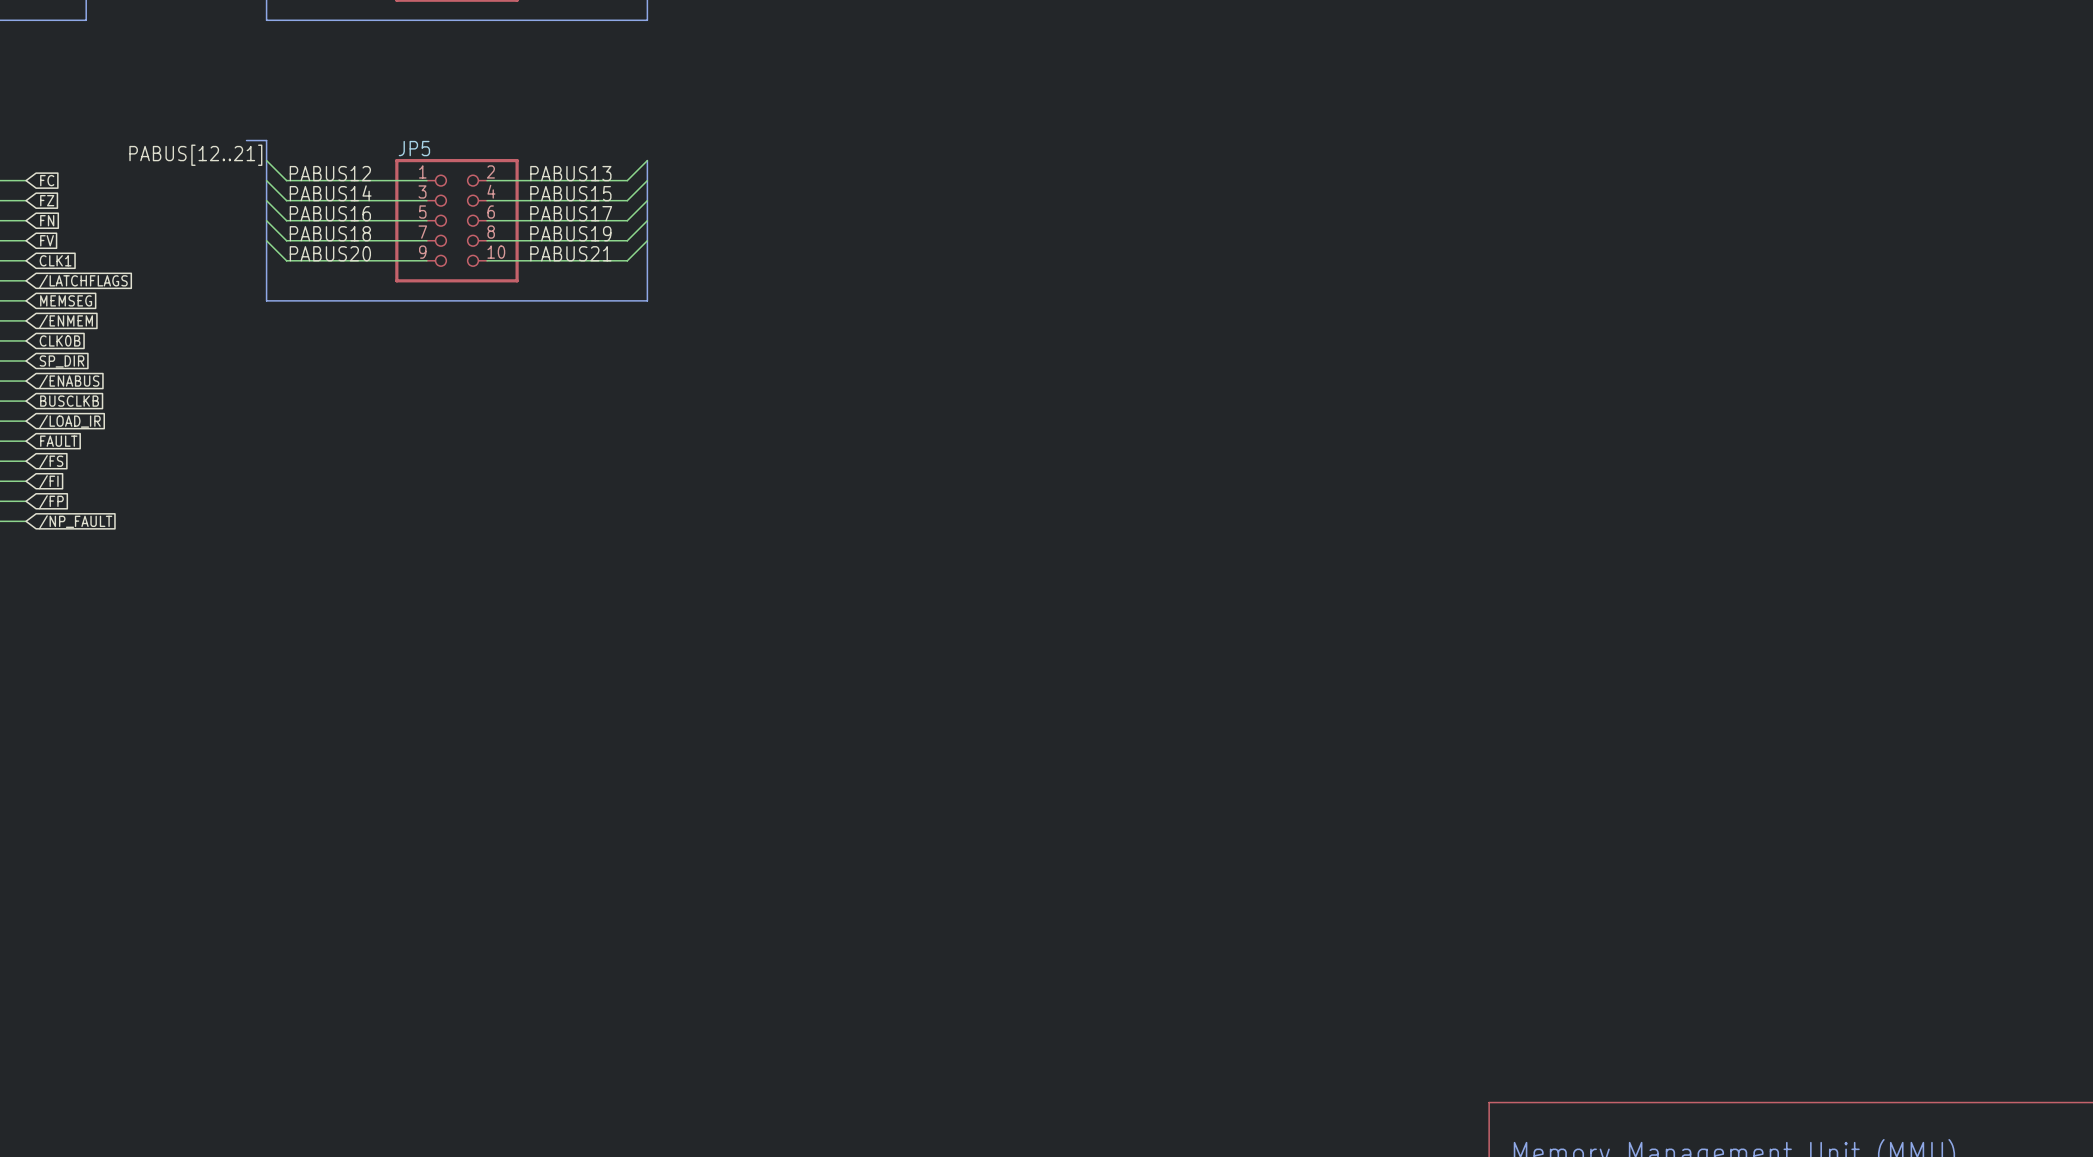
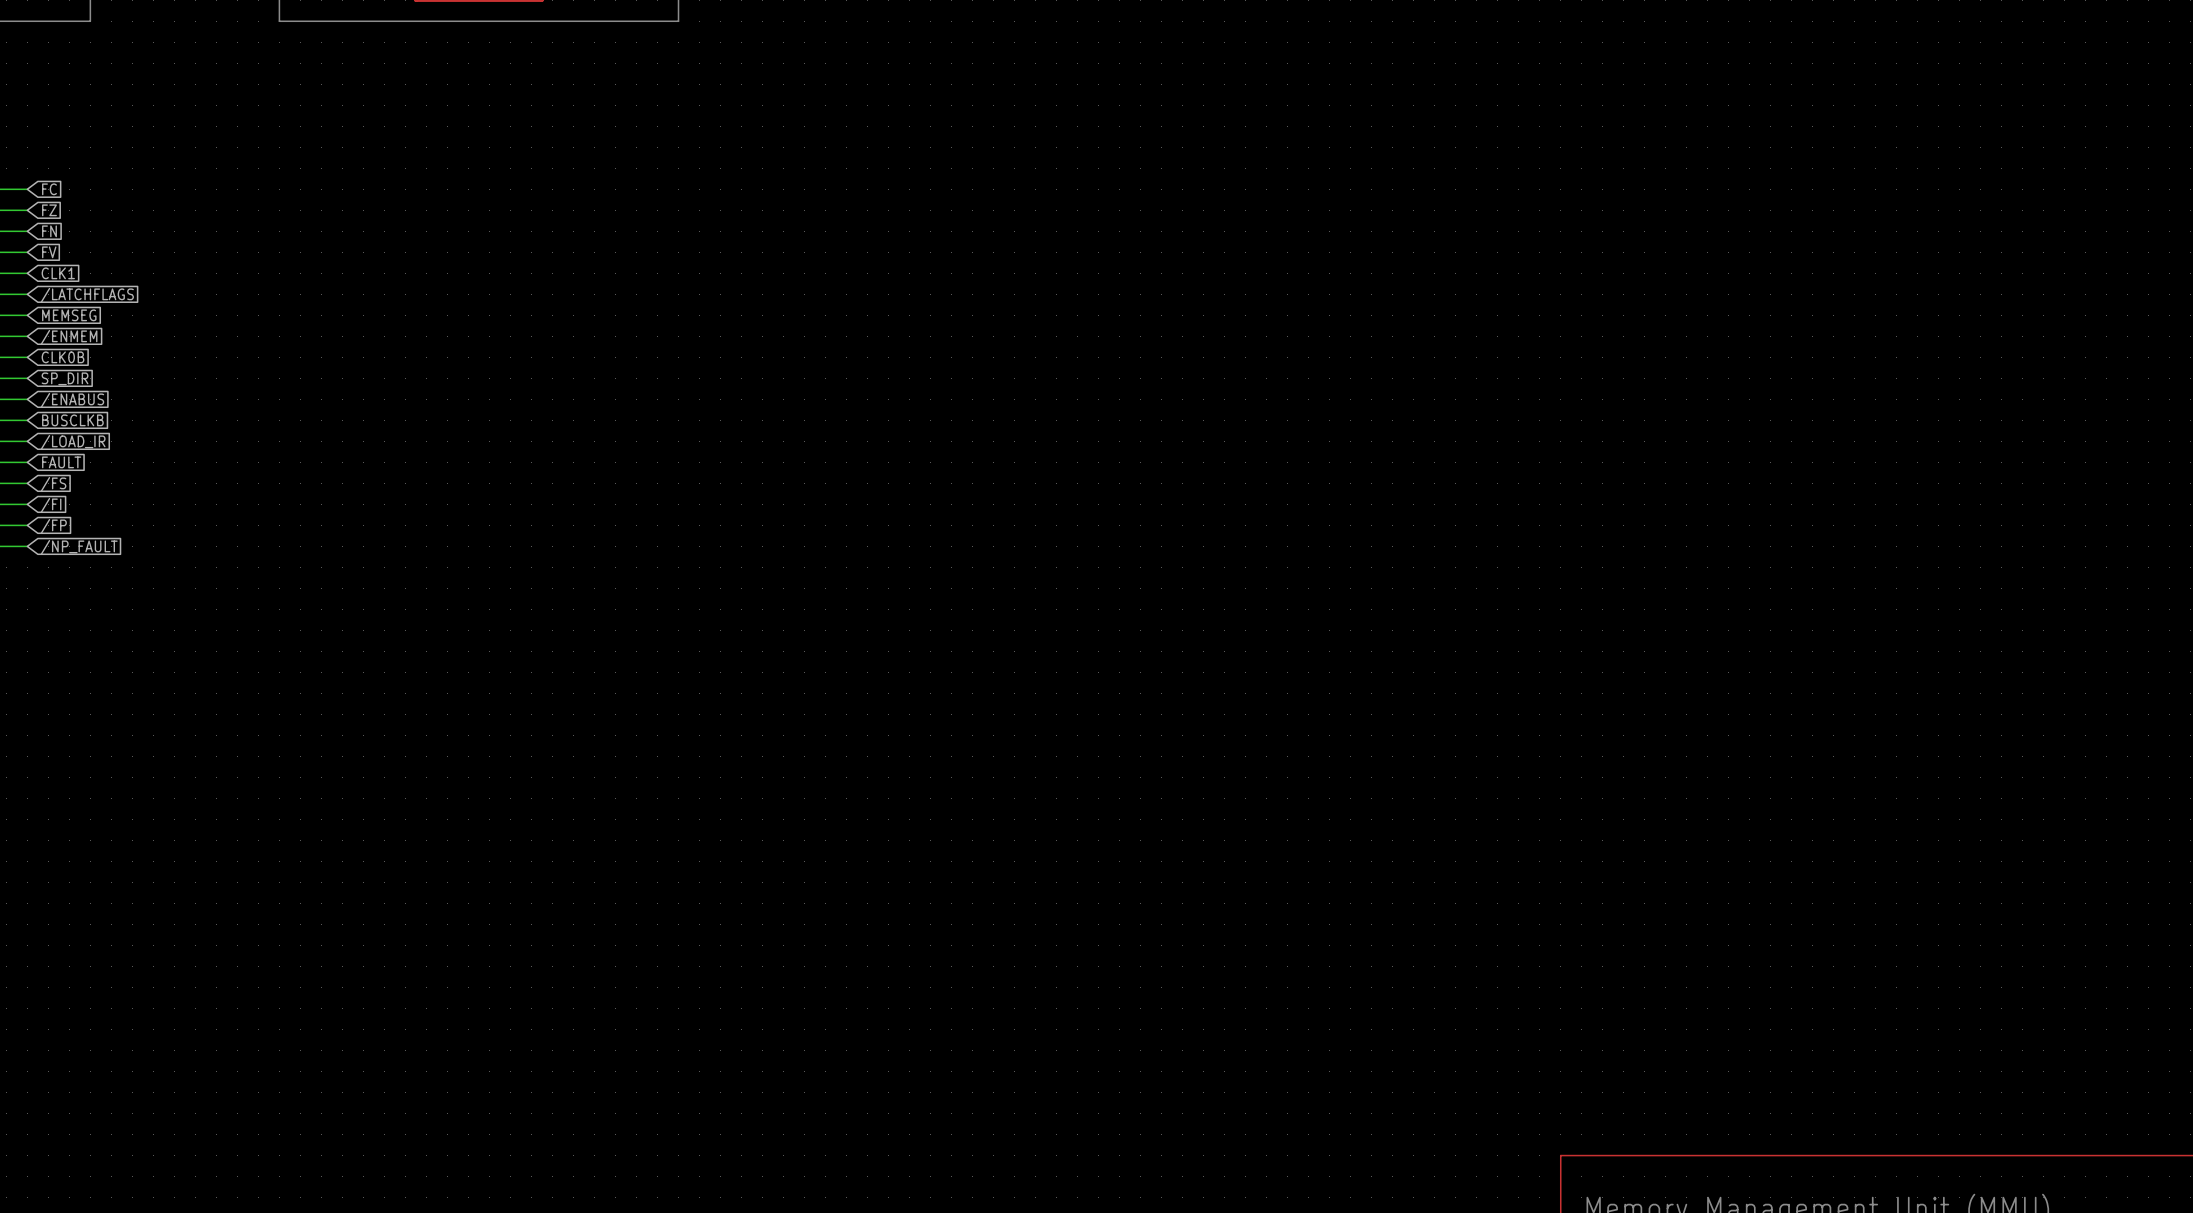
bus: (246, 140) (266, 140) (266, 300) (647, 300) (647, 160) -> none
label: PABUS[12..21] (195, 155) -> none
wire: (266, 160) (286, 180) (426, 180) -> none
wire: (647, 160) (627, 180) (487, 180) -> none
label: PABUS12 (330, 173) -> none
label: PABUS13 (570, 173) -> none
wire: (266, 180) (286, 200) (426, 200) -> none
wire: (647, 180) (627, 200) (487, 200) -> none
label: PABUS14 (330, 193) -> none
label: PABUS15 (570, 193) -> none
wire: (266, 200) (286, 220) (426, 220) -> none
wire: (647, 200) (627, 220) (487, 220) -> none
label: PABUS16 (330, 213) -> none
label: PABUS17 (571, 213) -> none
wire: (266, 220) (286, 240) (426, 240) -> none
JP5: (456, 220) -> none
wire: (647, 220) (627, 240) (487, 240) -> none
label: PABUS18 (330, 233) -> none
label: PABUS19 (570, 233) -> none
wire: (266, 240) (286, 260) (426, 260) -> none
wire: (647, 240) (627, 260) (487, 260) -> none
label: PABUS20 (330, 253) -> none
label: PABUS21 (570, 253) -> none

